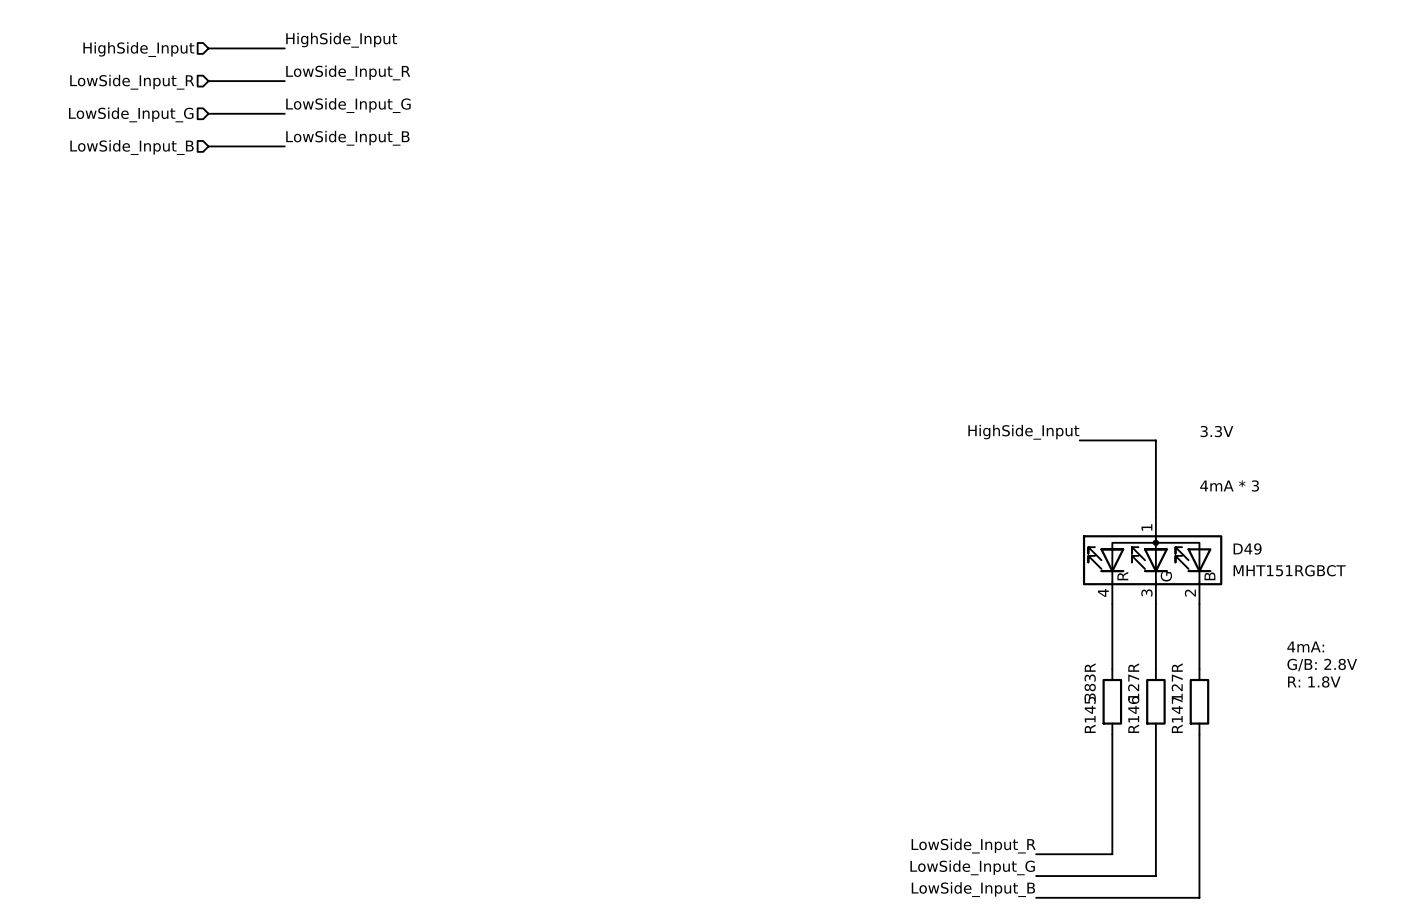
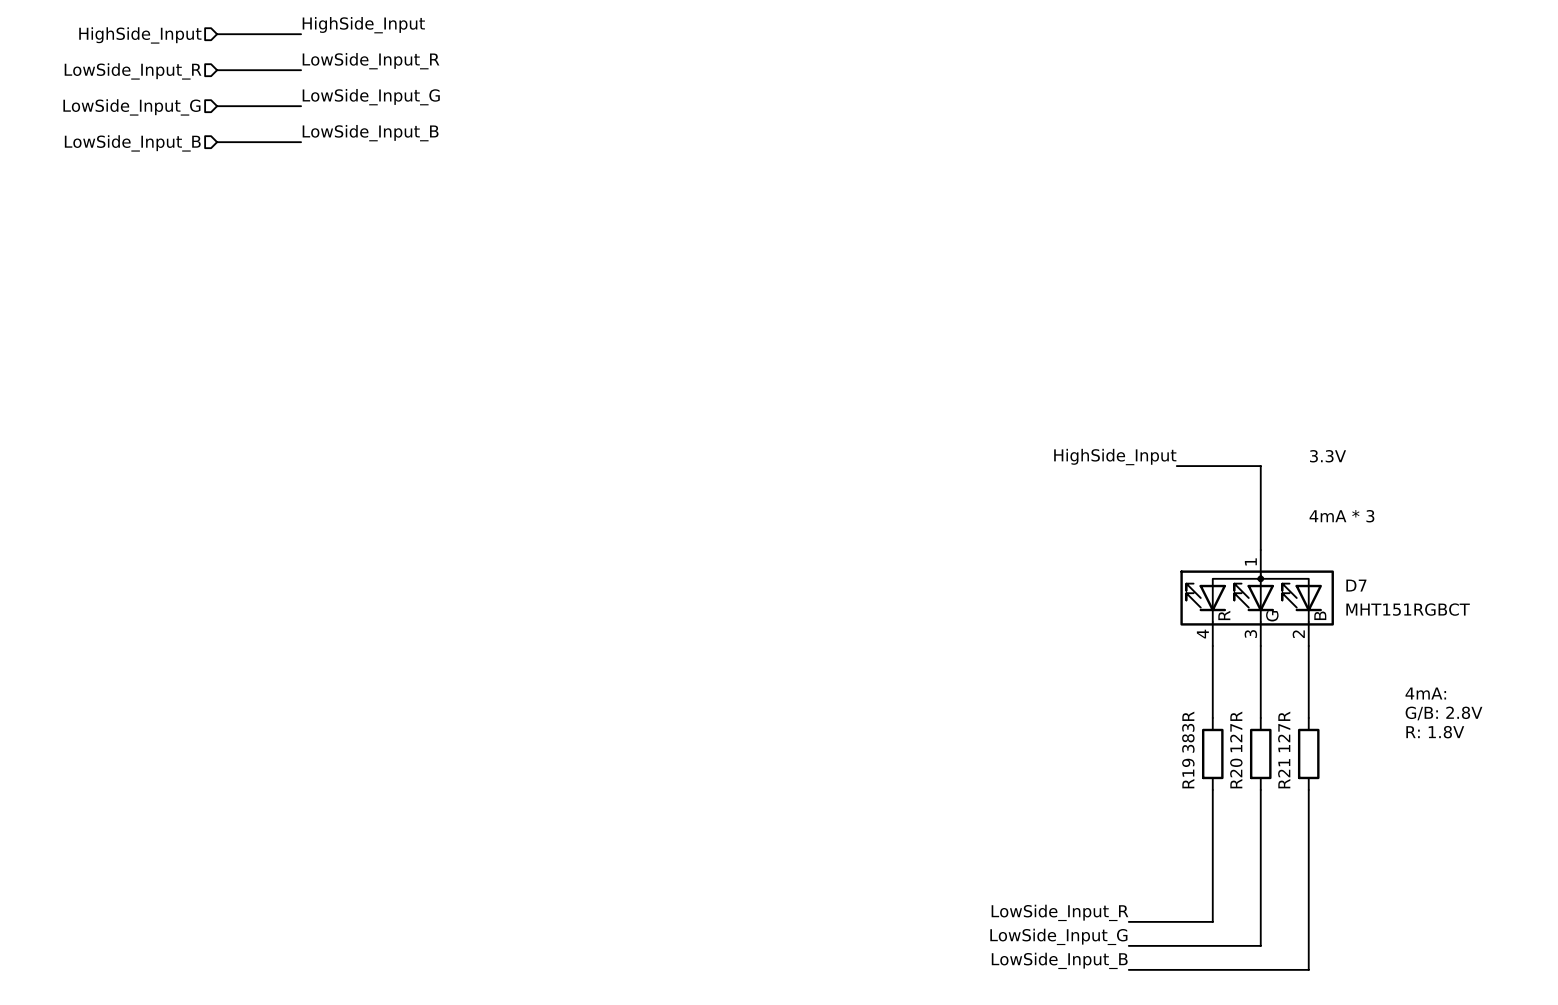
D49 name: D49 (1247, 548) -> D7 (1356, 585)
R145 name: R145 (1090, 714) -> R19 (1188, 773)
R146 name: R146 (1133, 714) -> R20 (1236, 773)
R147 name: R147 (1177, 714) -> R21 (1284, 773)

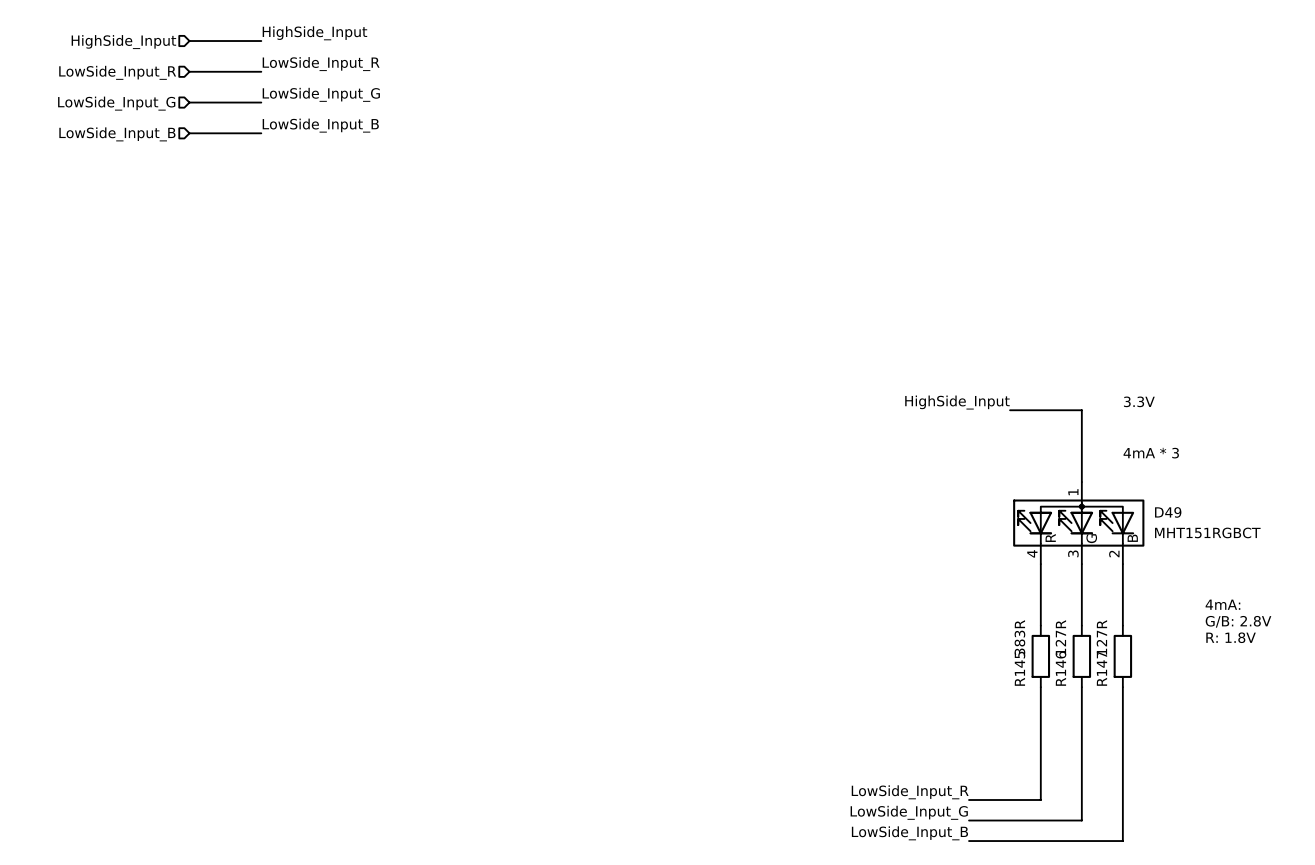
D7 name: D7 (1356, 585) -> D49 (1168, 512)
R19 name: R19 (1188, 773) -> R145 (1020, 668)
R20 name: R20 (1236, 773) -> R146 (1060, 668)
R21 name: R21 (1284, 773) -> R147 (1101, 668)

